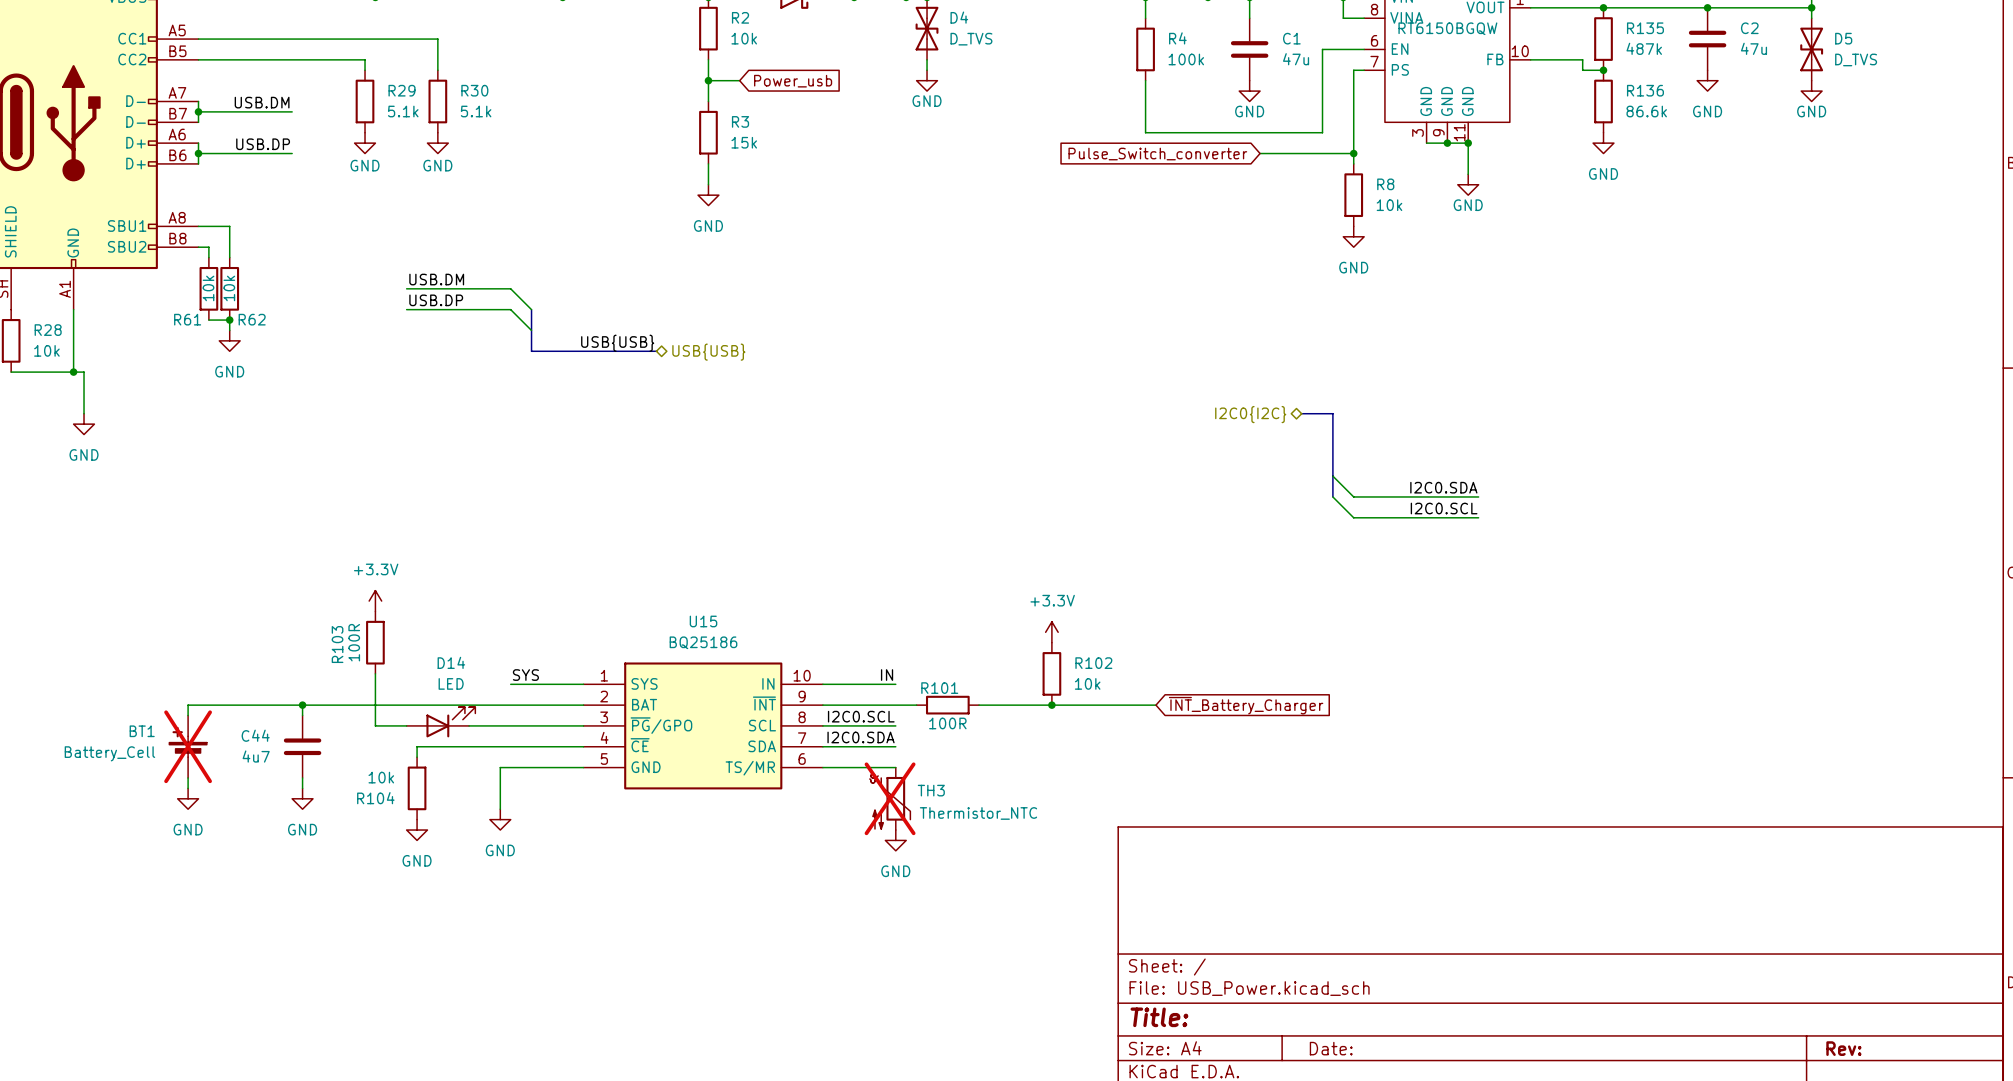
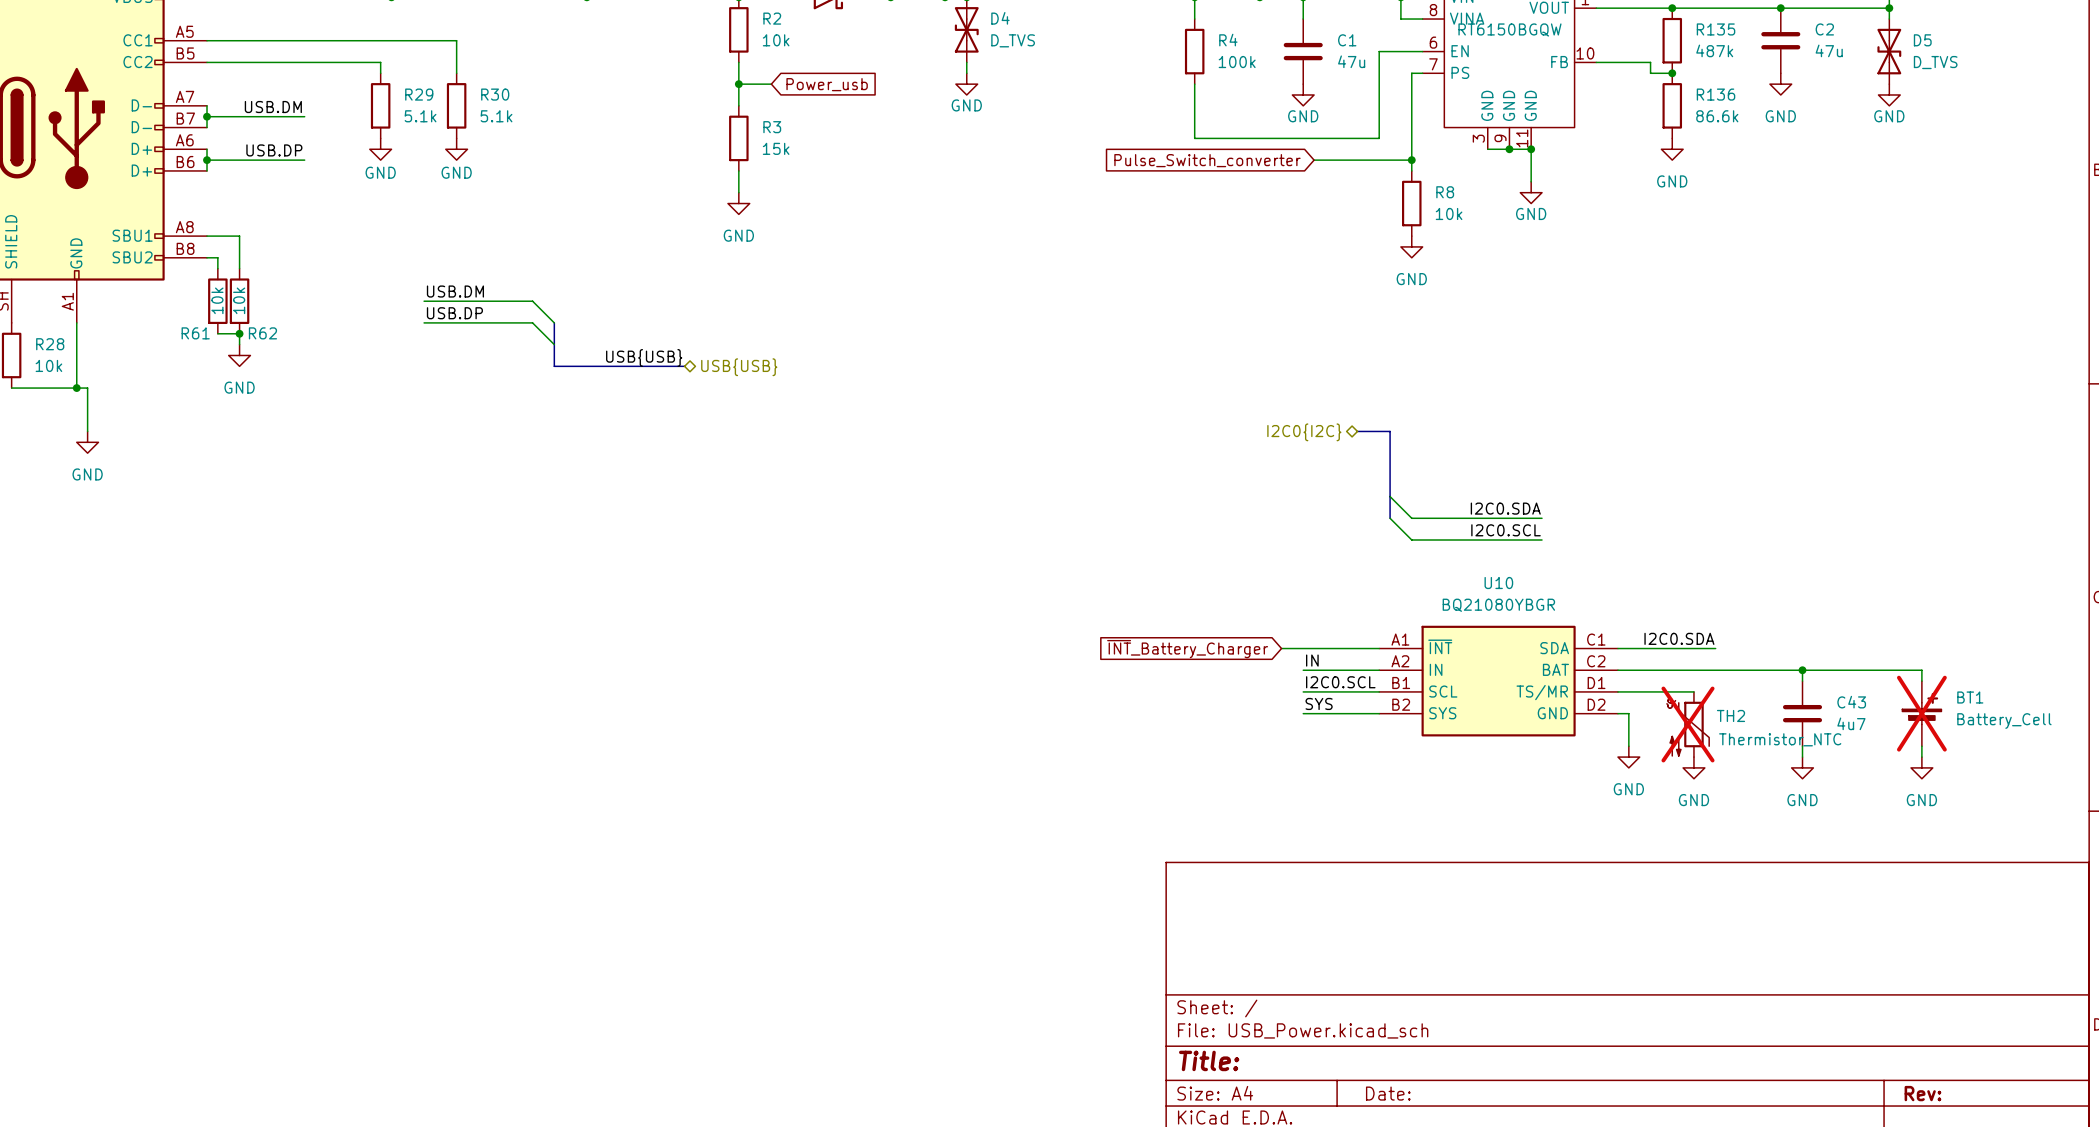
power symbol: +3.3V (375, 601) -> none
label: none -> I2C0.SDA (1679, 638)
wire: none -> (1281, 648) (1379, 648)
wire: none -> (1617, 648) (1715, 648)
power symbol: +3.3V (1051, 632) -> none
label: none -> IN (1312, 660)
R103: 100R (375, 642) -> none
wire: none -> (1303, 670) (1379, 670)
wire: none -> (1617, 670) (1921, 670) (1921, 681)
wire: none -> (1802, 670) (1802, 681)
junction: none -> (1802, 670)
U10: none -> BQ21080YBGR (1498, 681)
label: none -> I2C0.SCL (1340, 682)
wire: none -> (1303, 691) (1379, 691)
wire: none -> (1617, 691) (1693, 691)
wire: (375, 673) (375, 725) (406, 725) -> none
R102: 10k (1051, 673) -> none
label: SYS (525, 675) -> none
label: IN (887, 675) -> none
label: none -> SYS (1319, 703)
wire: (510, 684) (583, 684) -> none
wire: (822, 684) (895, 684) -> none
wire: none -> (1303, 713) (1379, 713)
wire: none -> (1617, 713) (1628, 713) (1628, 746)
C43: none -> 4u7 (1802, 713)
TH2: none -> Thermistor_NTC (1688, 724)
wire: (302, 705) (302, 715) -> none
junction: (302, 705) -> none
wire: (583, 705) (188, 705) (188, 715) -> none
wire: (822, 705) (916, 705) -> none
R101: 100R (947, 705) -> none
wire: (979, 705) (1155, 705) -> none
junction: (1051, 705) -> none
global label rotation: 0° (1246, 705) -> 180° (1187, 649)
wire: none -> (1802, 746) (1802, 757)
wire: none -> (1921, 746) (1921, 757)
label: I2C0.SCL (861, 716) -> none
D14: LED (440, 722) -> none
wire: (469, 725) (583, 725) -> none
U15: BQ25186 (703, 725) -> none
wire: (822, 725) (895, 725) -> none
power symbol: none -> GND (1628, 757)
power symbol: none -> GND (1693, 767)
power symbol: none -> GND (1802, 767)
power symbol: none -> GND (1921, 767)
label: I2C0.SDA (861, 737) -> none
BT1 flip: as is (188, 742) -> left-right (1921, 708)
BT1 position: (188, 746) -> (1921, 713)
C44: 4u7 (302, 746) -> none
wire: (583, 746) (417, 746) (417, 757) -> none
wire: (822, 746) (895, 746) -> none
wire: (583, 767) (500, 767) (500, 809) -> none
wire: (822, 767) (895, 767) -> none
wire: (188, 777) (188, 788) -> none
wire: (302, 777) (302, 788) -> none
R104: 10k (417, 788) -> none
power symbol: GND (188, 798) -> none
power symbol: GND (302, 798) -> none
TH3: Thermistor_NTC (890, 798) -> none
power symbol: GND (500, 819) -> none
power symbol: GND (417, 830) -> none
power symbol: GND (895, 840) -> none

